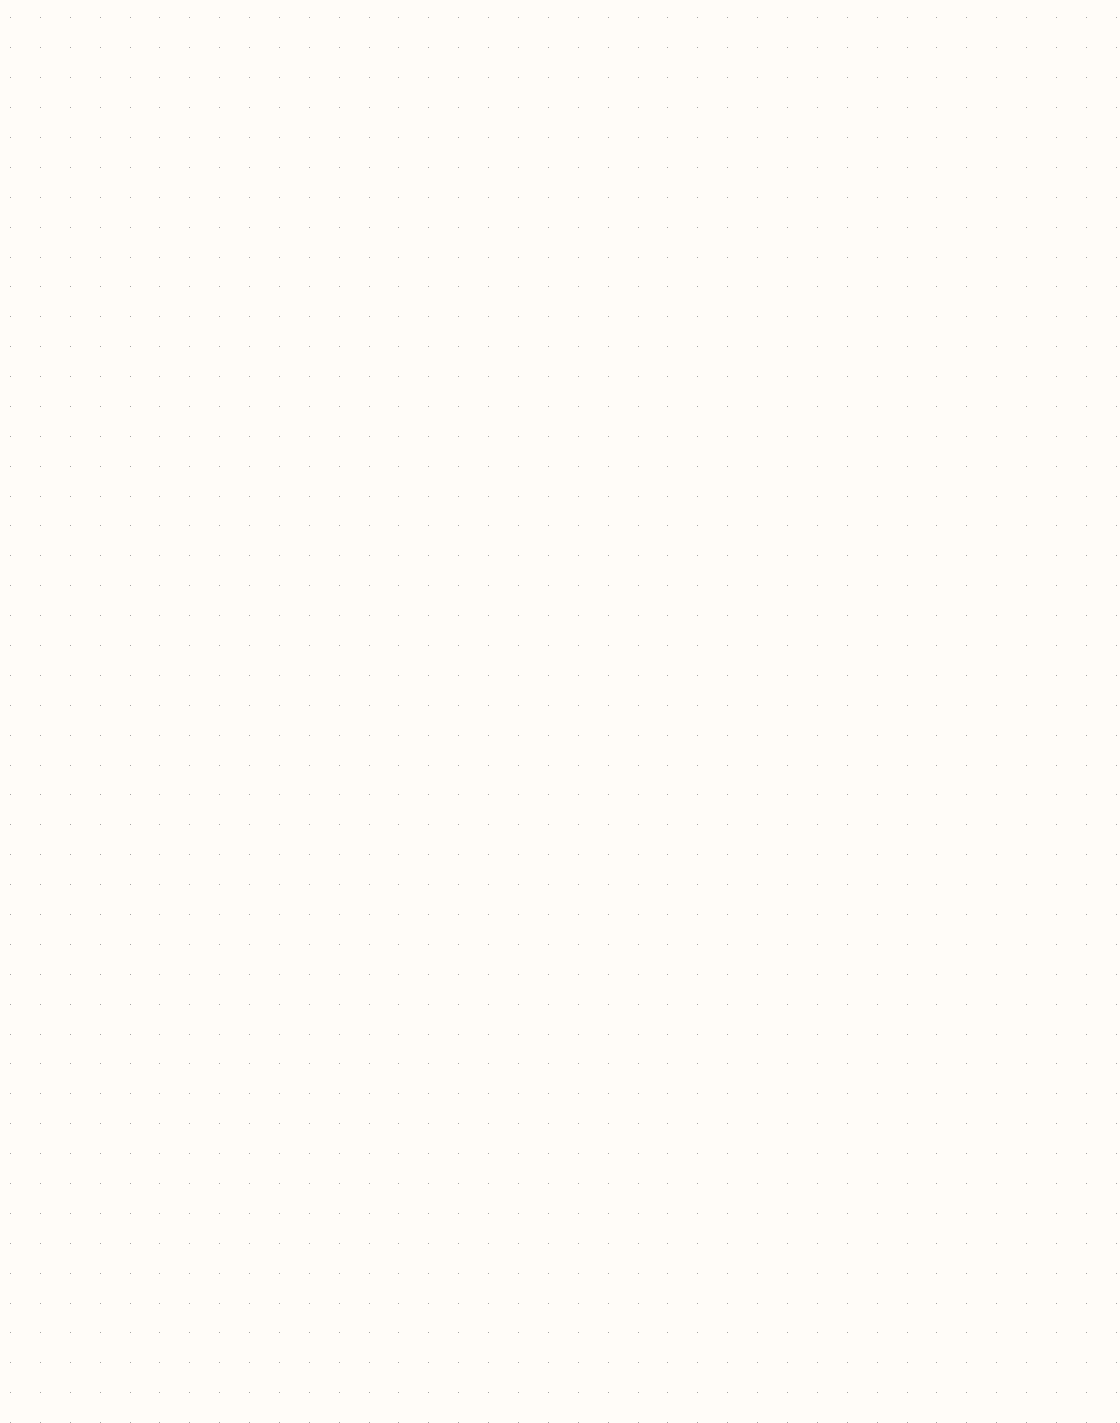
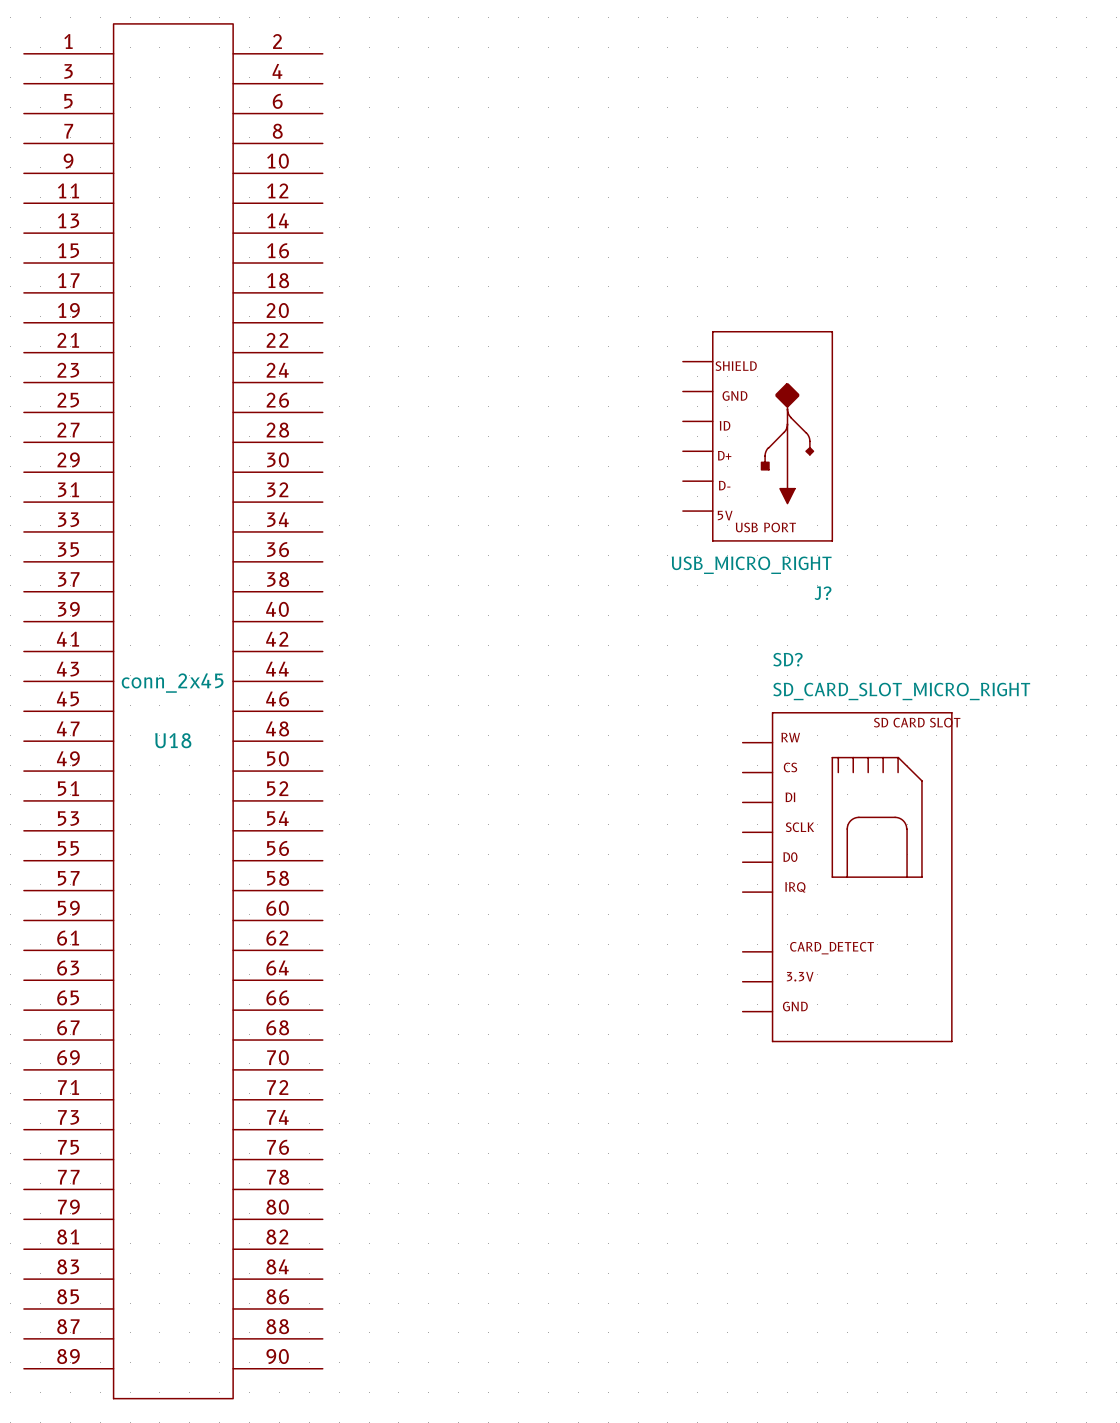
J?: none -> USB_MICRO_RIGHT (757, 436)
U18: none -> conn_2x45 (173, 711)
SD?: none -> SD_CARD_SLOT_MICRO_RIGHT (847, 877)

